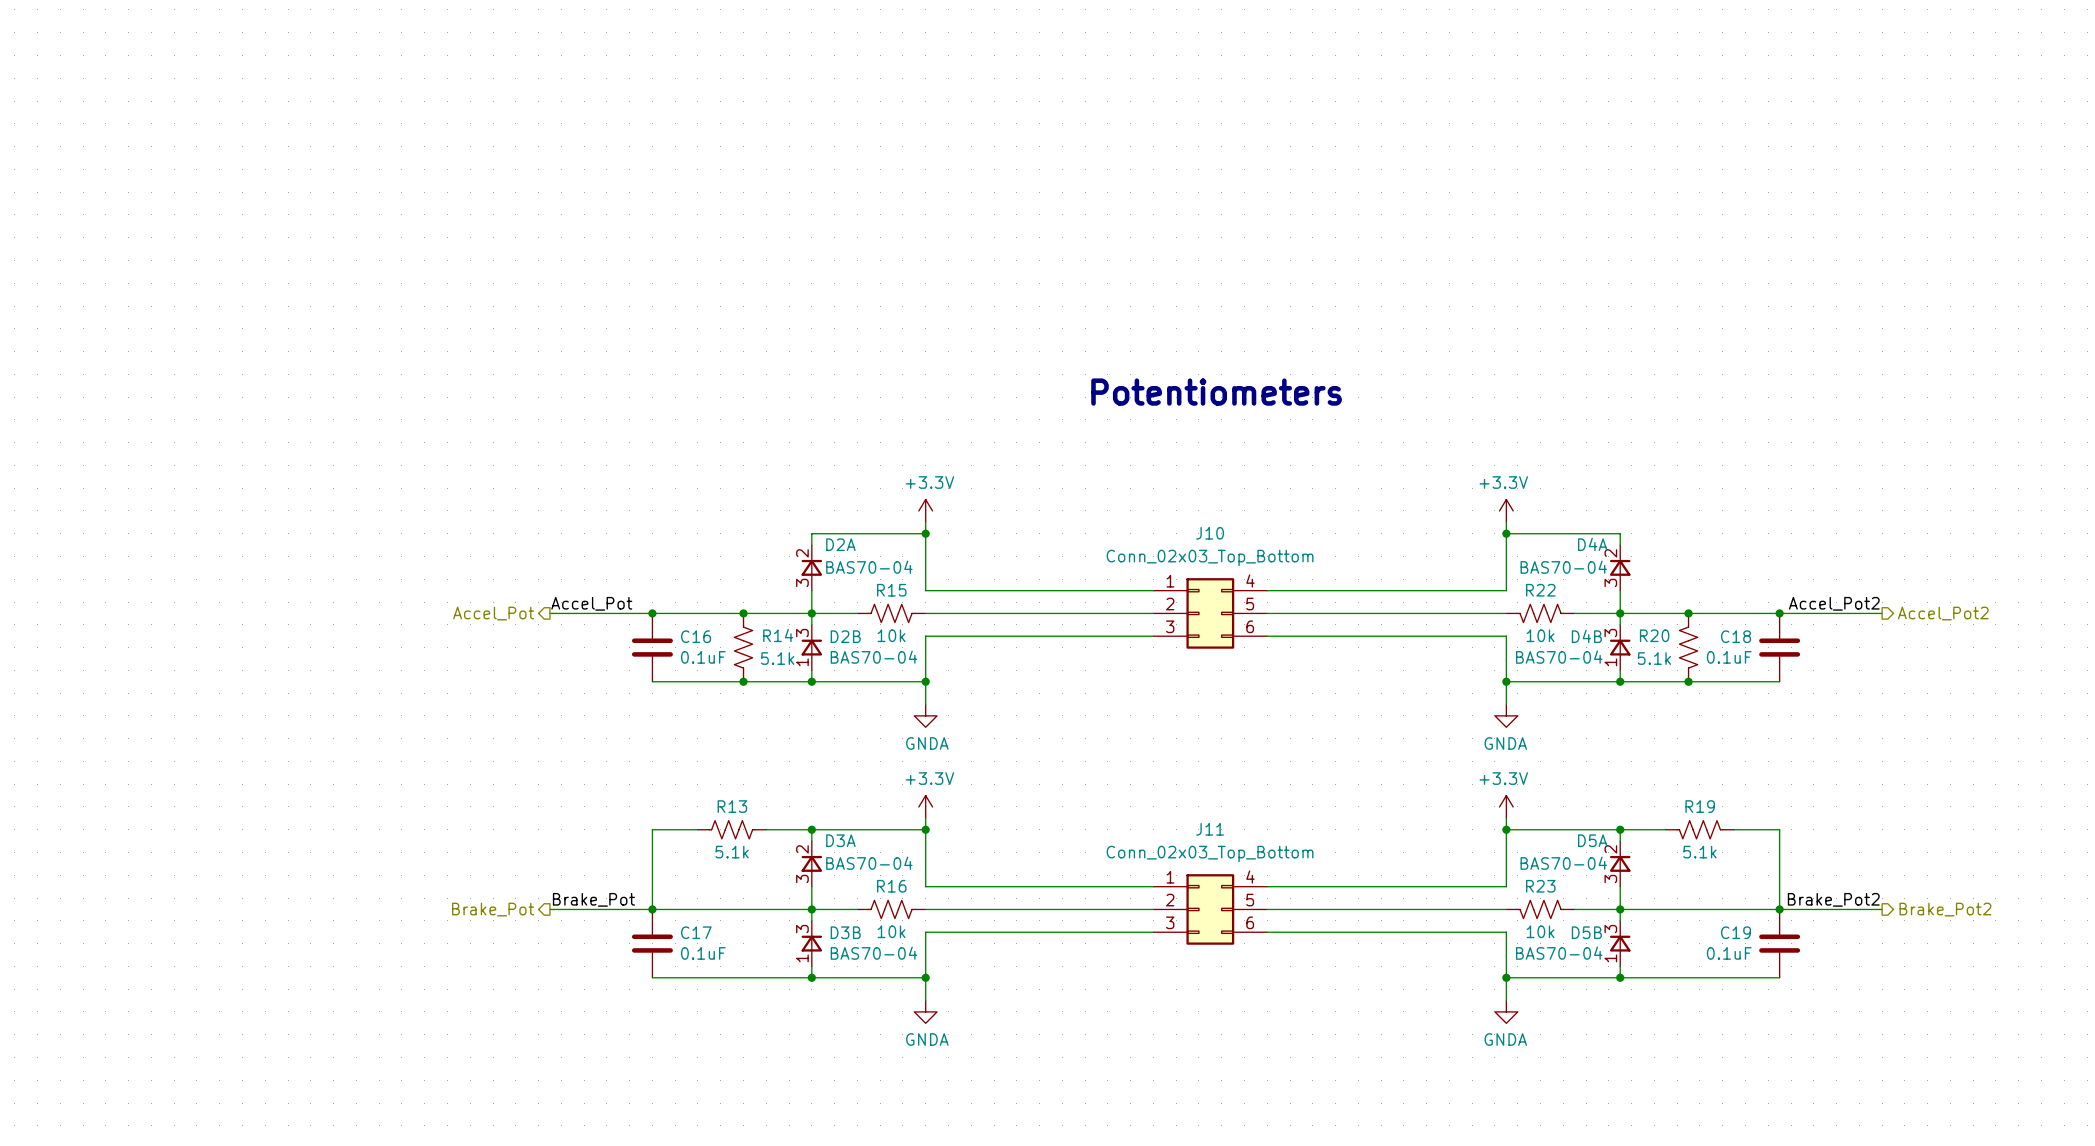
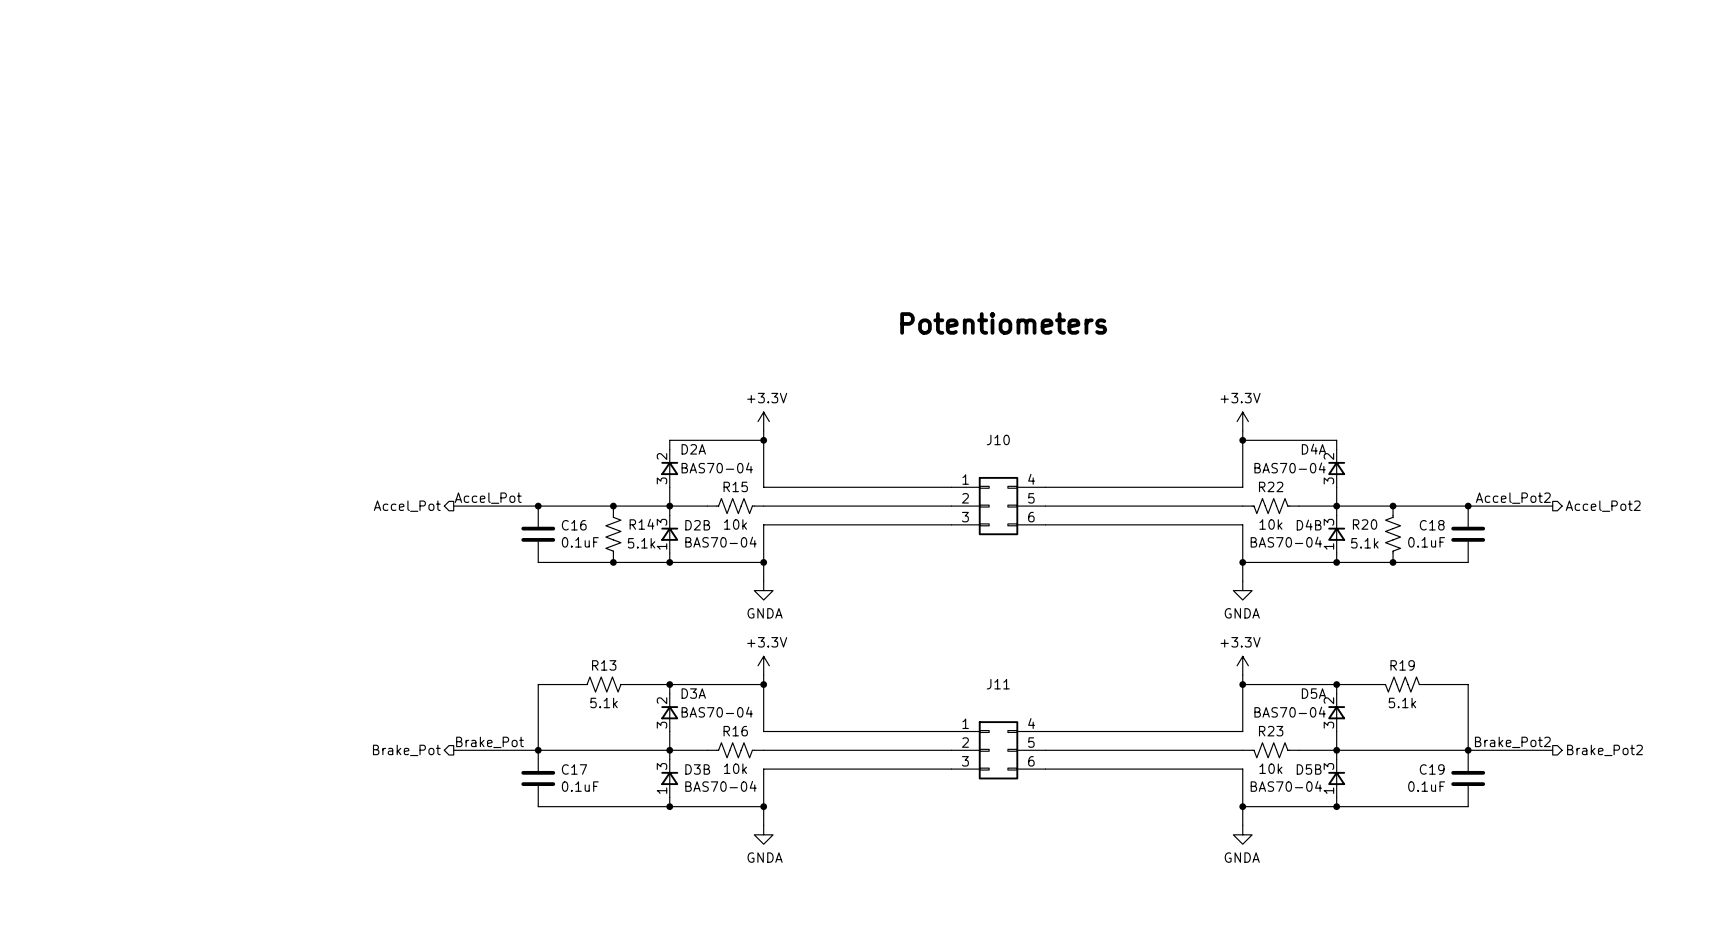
J10 value: Conn_02x03_Top_Bottom (1210, 557) -> none
J11 value: Conn_02x03_Top_Bottom (1210, 854) -> none

